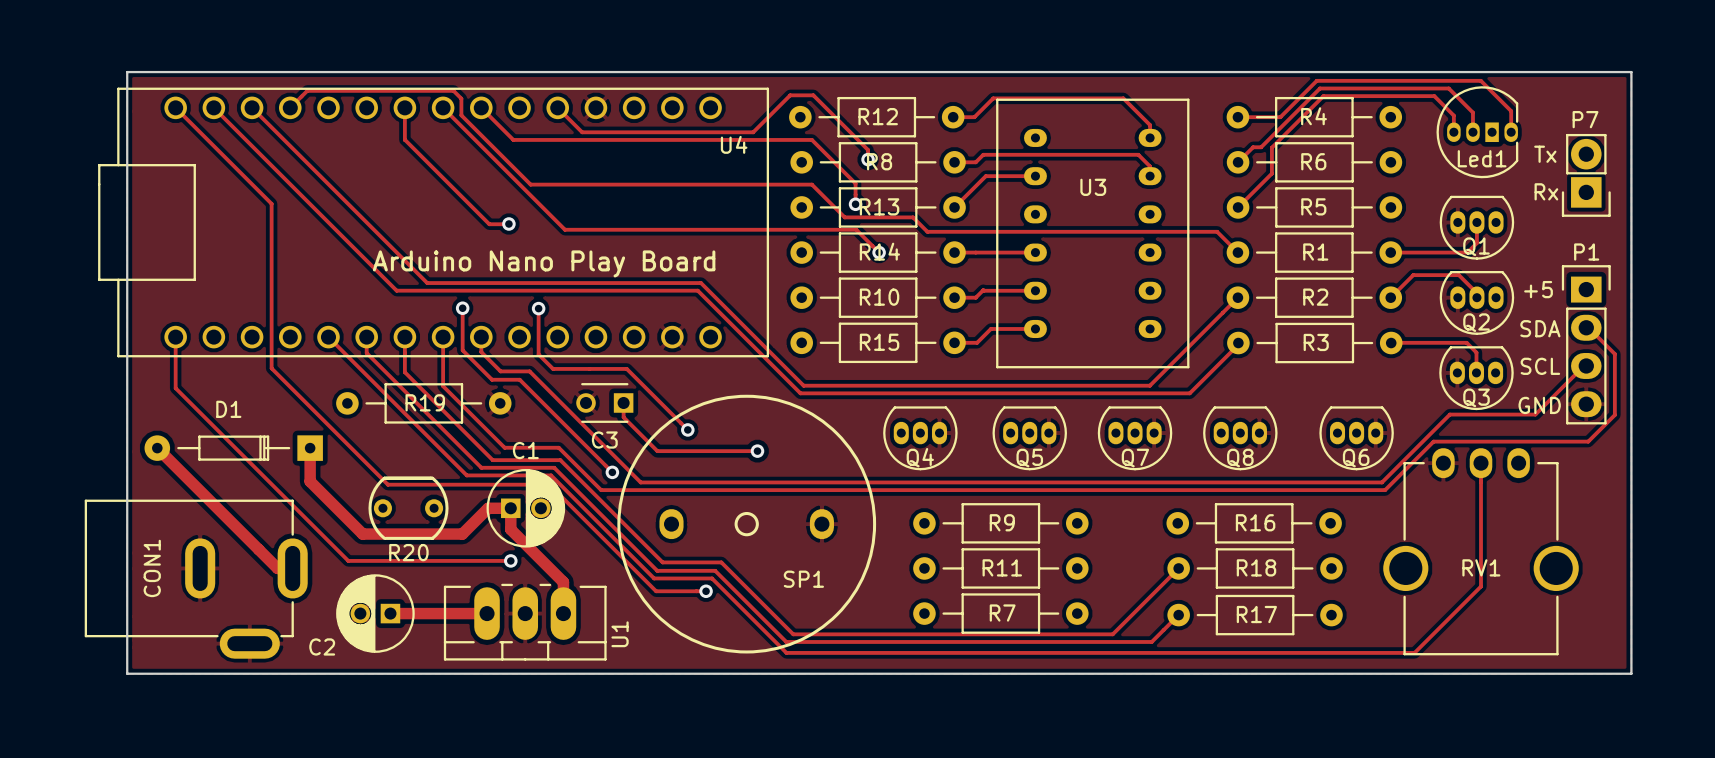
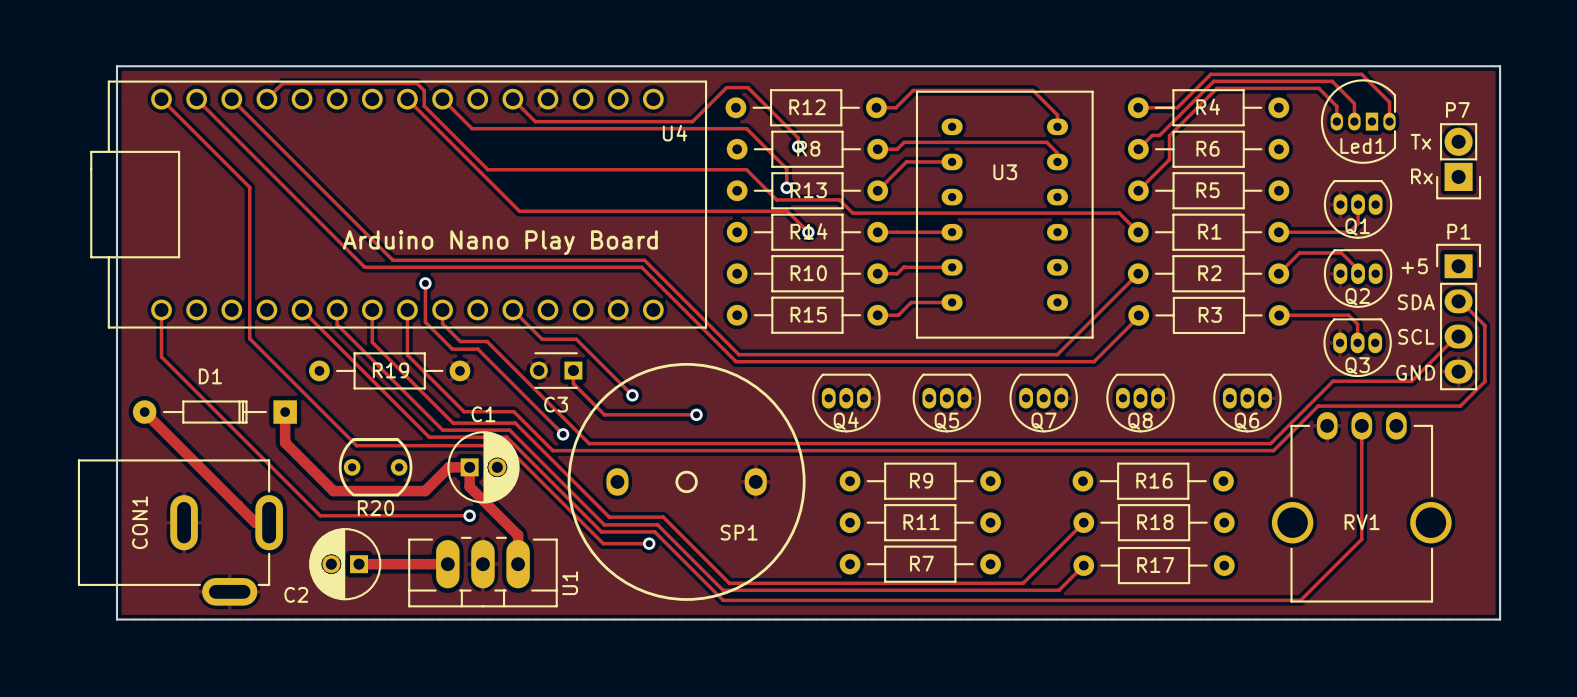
track: (404, 107) (404, 139) -> none
track: (405, 139) (489, 224) (508, 223) -> none
via: (508, 223) -> none
track: (538, 308) (538, 354) (553, 368) (589, 368) -> (512, 309) (542, 339)
via: (538, 308) -> none

